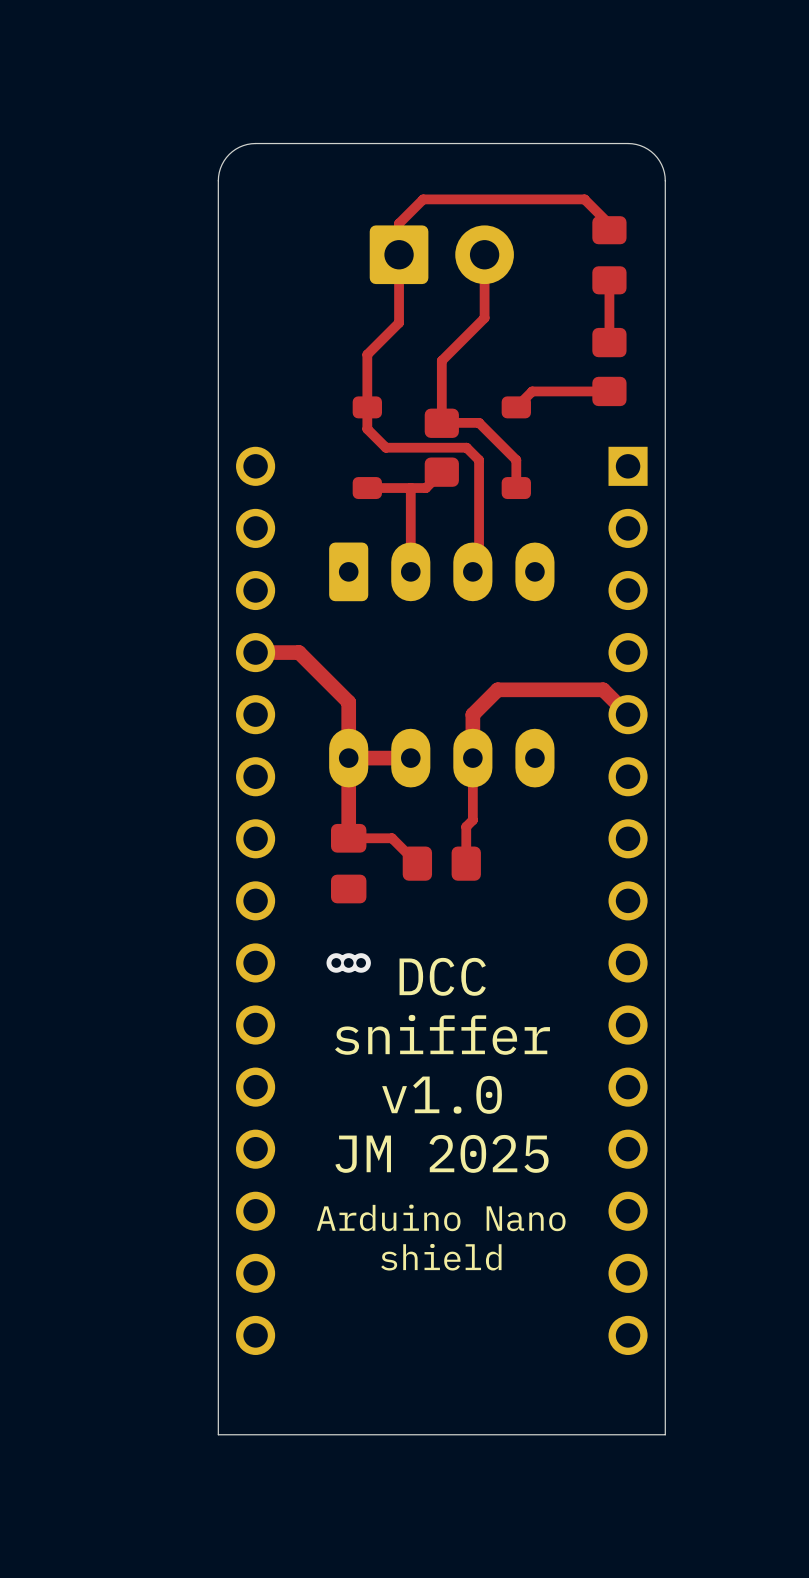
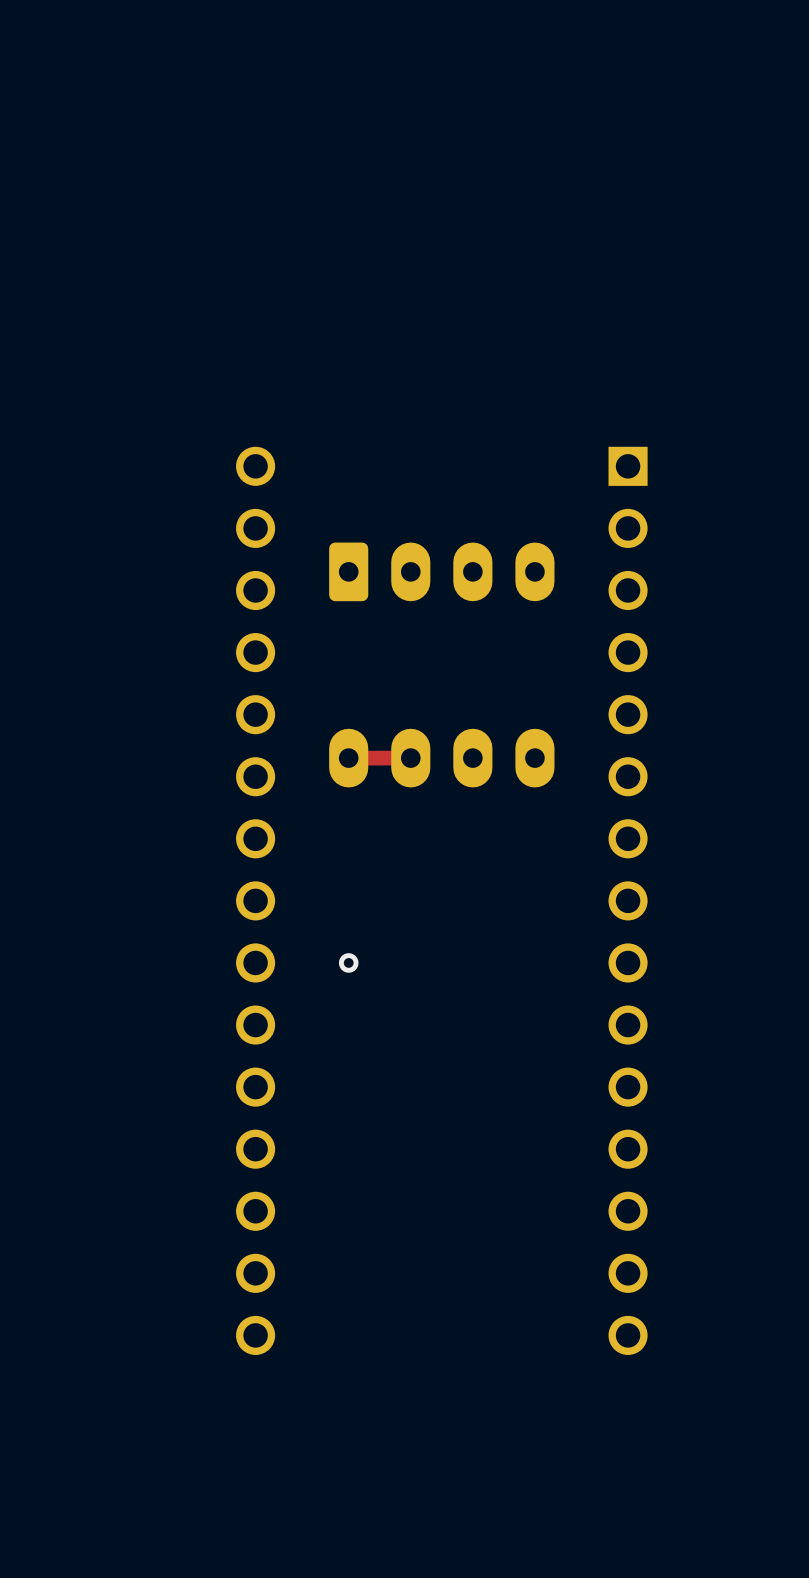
board edge: (628, 143) (251, 143) (232, 151) (220, 168) (218, 180) (218, 1434) (665, 1434) (665, 180) (661, 164) (654, 154) (644, 147) (628, 143) -> none
top track: (609, 230) (609, 224) (584, 199) (423, 199) (399, 223) (399, 322) (367, 354) (367, 429) (385, 447) (466, 447) (479, 460) (479, 565) (472, 571) -> none
part: (441, 254) -> none
top track: (484, 254) (484, 318) (441, 360) (441, 423) (479, 422) (516, 460) (516, 488) -> none
part: (609, 255) -> none
top track: (609, 280) (609, 342) -> none
part: (609, 367) -> none
top track: (609, 391) (532, 391) (516, 407) -> none
part: (367, 447) -> none
part: (441, 447) -> none
part: (516, 447) -> none
top track: (441, 472) (425, 488) (367, 488) -> none
top track: (410, 488) (410, 571) -> none
top track: (255, 652) (299, 652) (348, 702) (348, 838) (392, 838) (417, 863) -> none
top track: (628, 714) (603, 689) (497, 689) (472, 714) (472, 820) (466, 826) (466, 863) -> none
part: (348, 863) -> none
part: (441, 863) -> none
via: (336, 962) -> none
via: (361, 962) -> none
text: DCC (442, 976) -> none
text: sniffer (442, 1034) -> none
text: v1.0 (442, 1094) -> none
text: JM 2025 (442, 1153) -> none
text: Arduino Nano (441, 1217) -> none
text: shield (441, 1257) -> none

